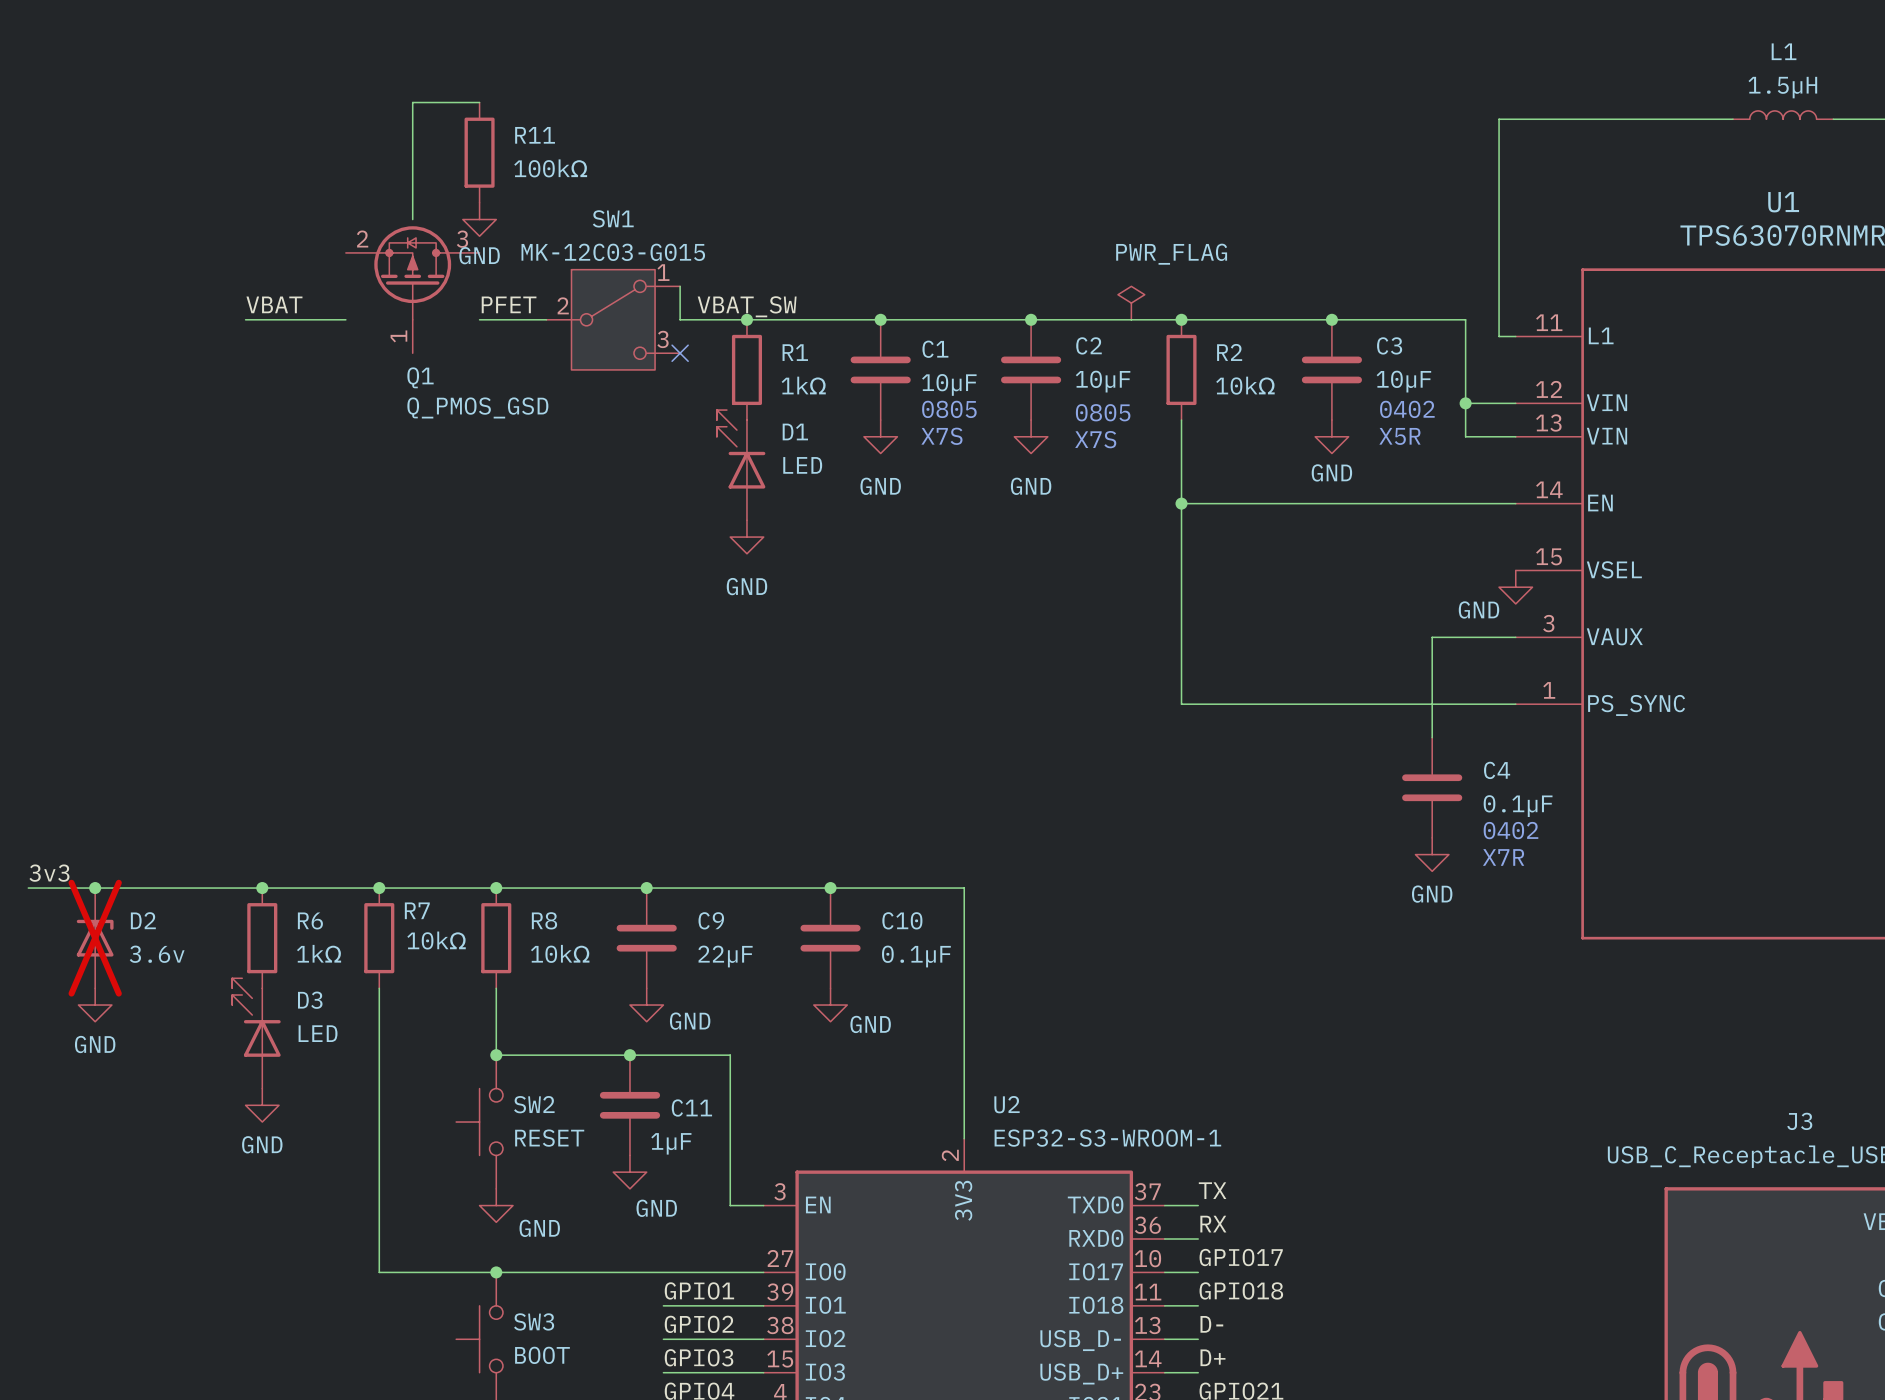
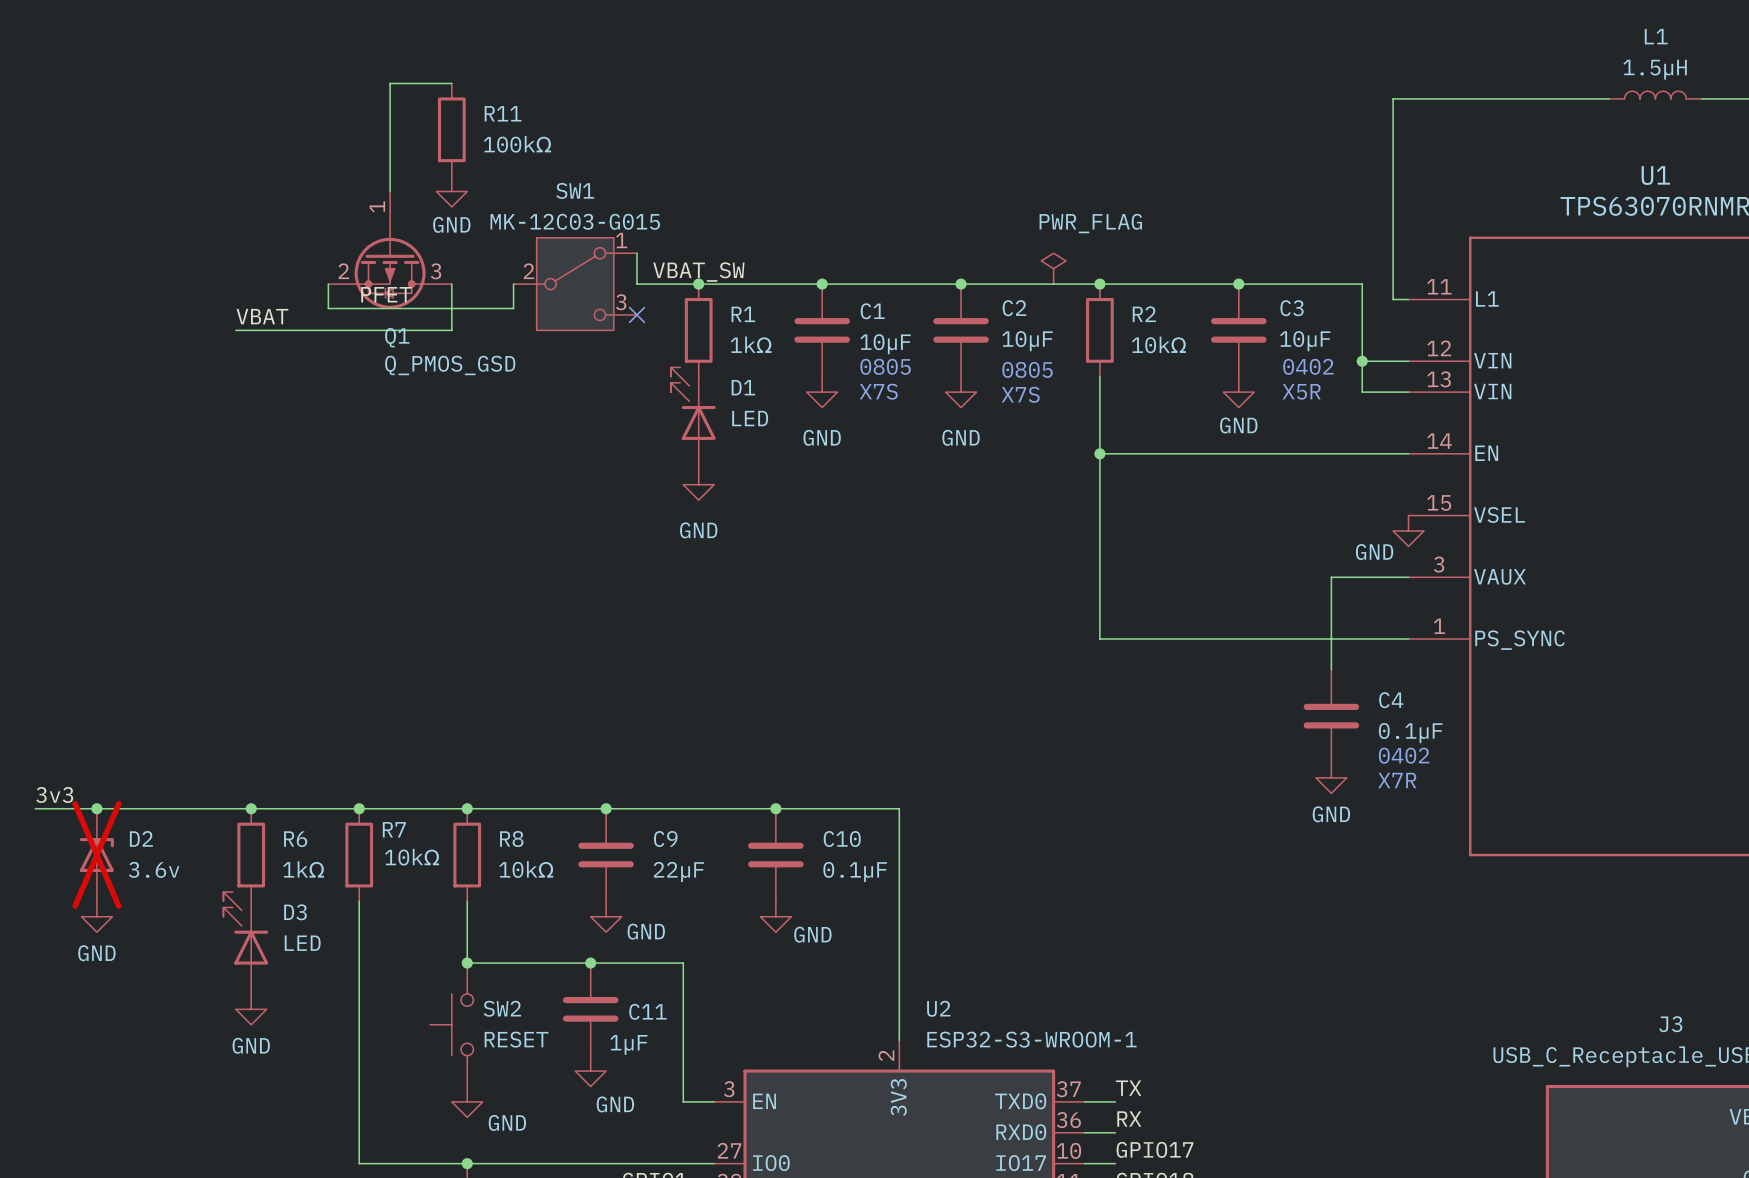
Q1 flip: as is (412, 273) -> up-down (390, 265)
label position: VBAT (274, 304) -> VBAT (262, 316)
label position: PFET (509, 304) -> PFET (386, 294)
wire: (245, 319) (345, 319) -> none
wire: (479, 319) (546, 319) -> (328, 284) (328, 308) (513, 308) (513, 284)
wire: none -> (451, 284) (451, 330) (235, 330)

